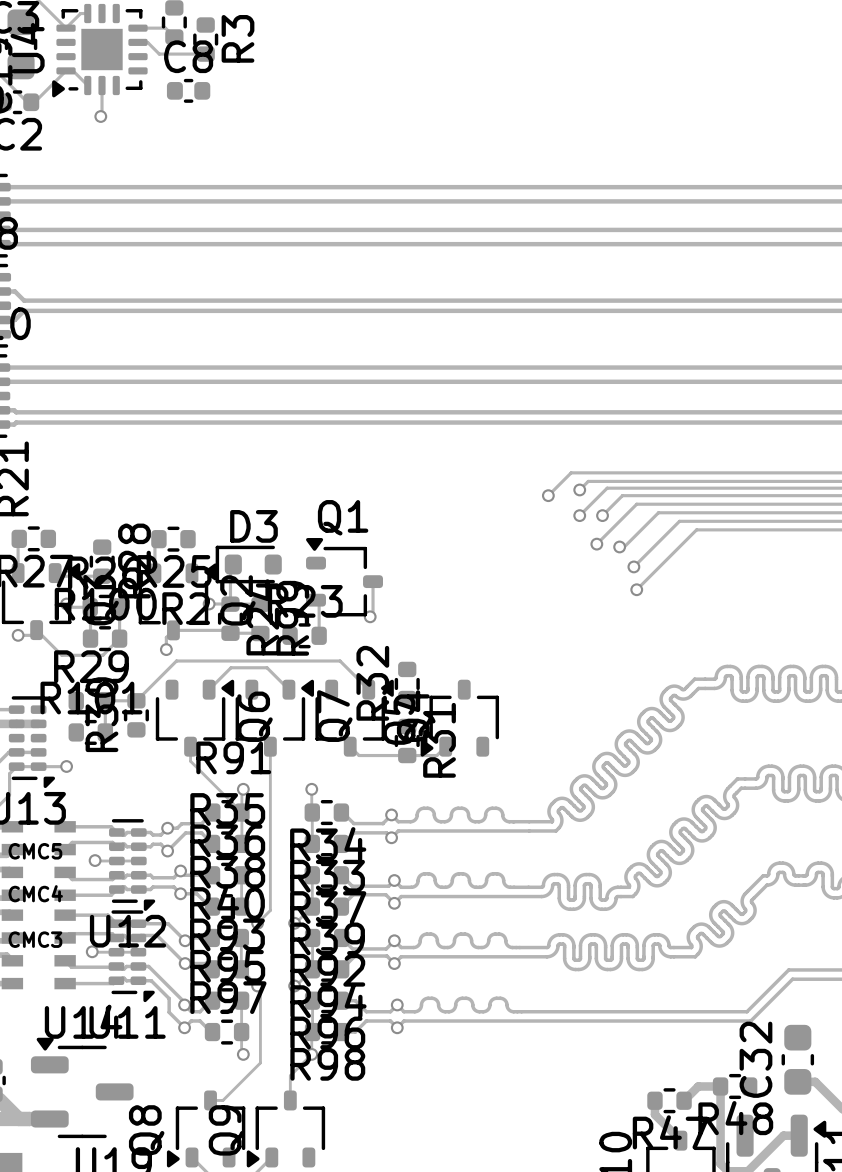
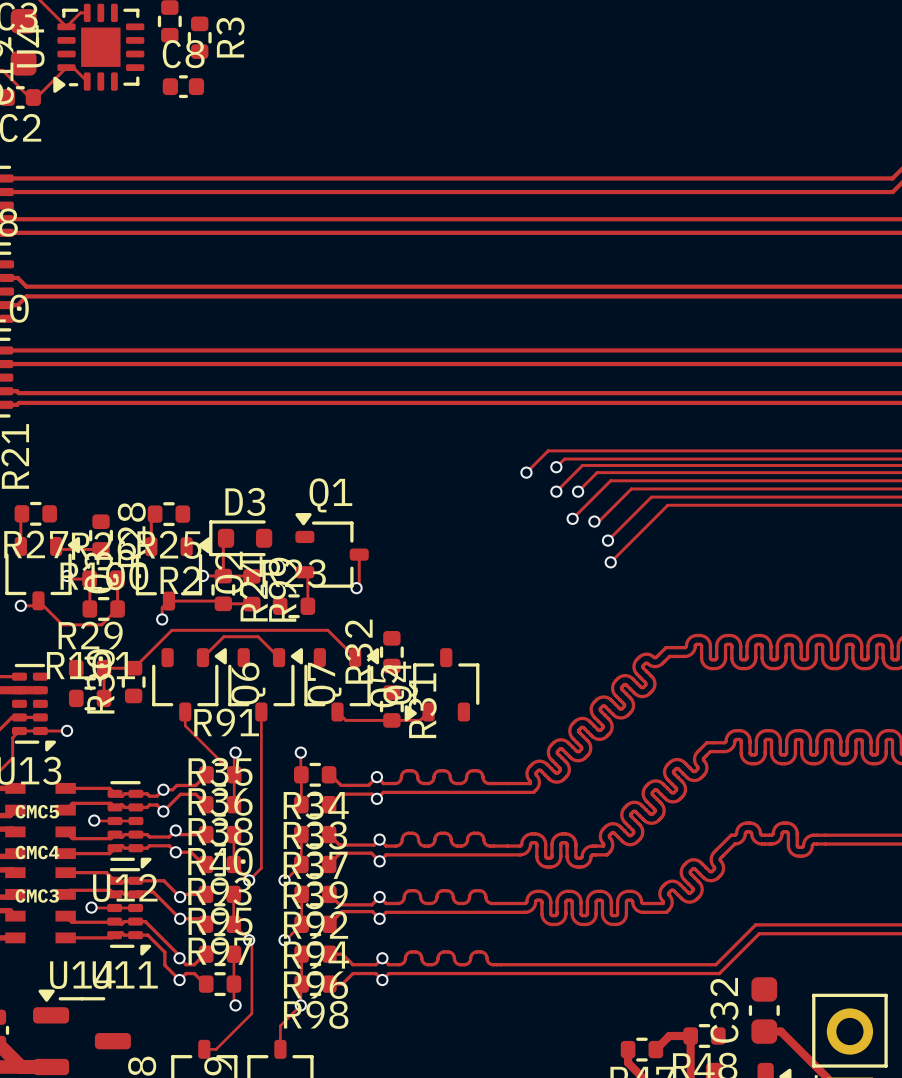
track: (138, 28) (165, 28) (174, 36) -> none
track: (138, 42) (147, 42) (159, 54) (205, 54) -> none
track: (102, 85) (100, 116) -> none
via: (100, 116) -> none

